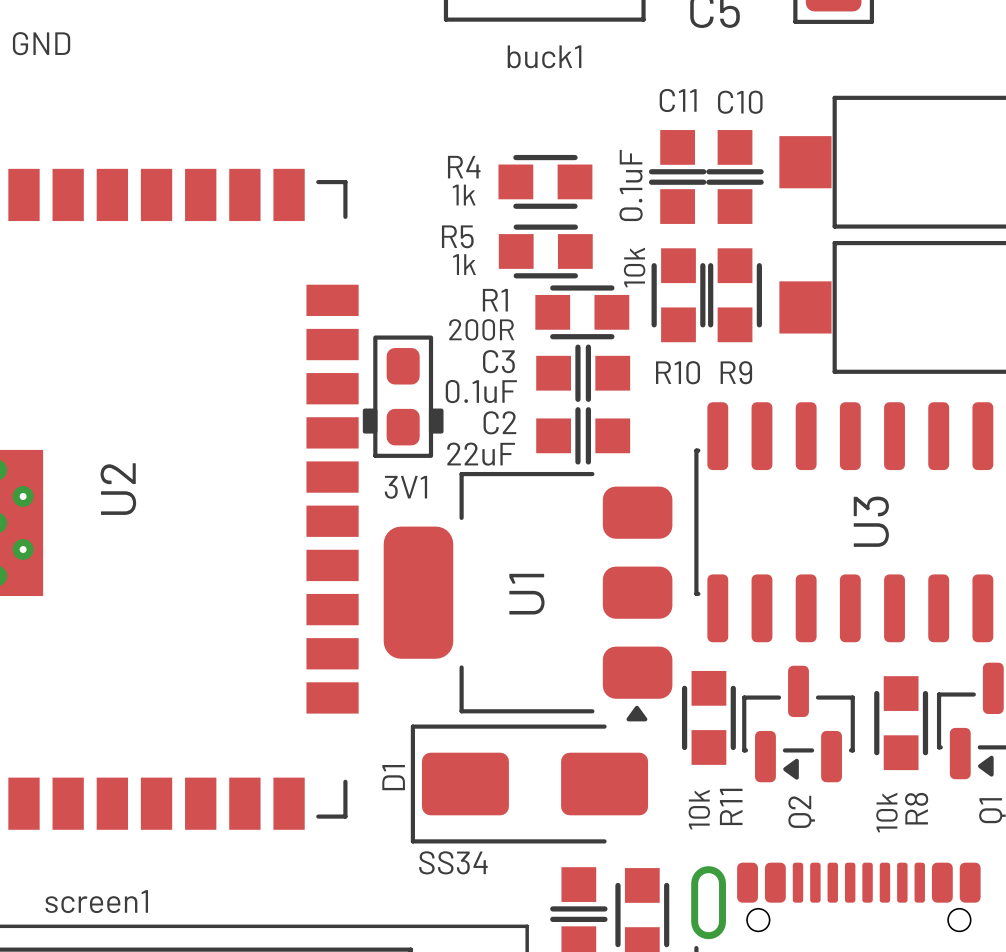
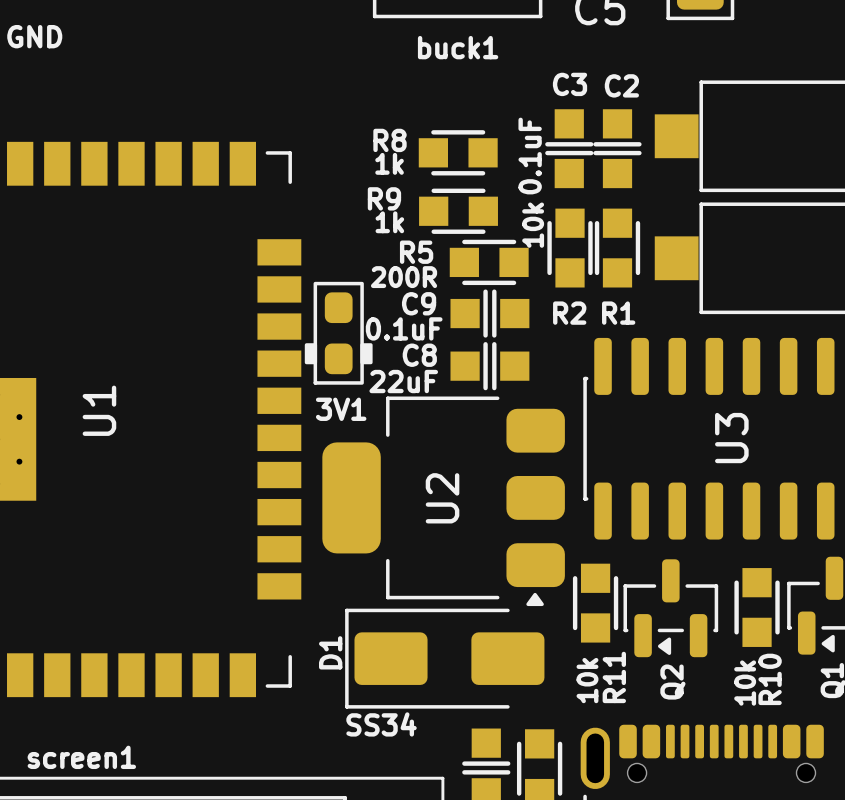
C11 name: C11 (678, 100) -> C3 (570, 84)
C10 name: C10 (740, 102) -> C2 (621, 85)
R4 name: R4 (464, 167) -> R8 (390, 140)
R5 name: R5 (457, 236) -> R9 (384, 198)
R1 name: R1 (495, 300) -> R5 (416, 252)
C3 name: C3 (498, 361) -> C9 (419, 303)
R10 name: R10 (678, 372) -> R2 (569, 313)
R9 name: R9 (736, 372) -> R1 (618, 313)
C2 name: C2 (499, 422) -> C8 (419, 355)
U2 name: U2 (118, 489) -> U1 (99, 410)
U1 name: U1 (526, 594) -> U2 (442, 498)
R8 name: R8 (916, 808) -> R10 (770, 679)

